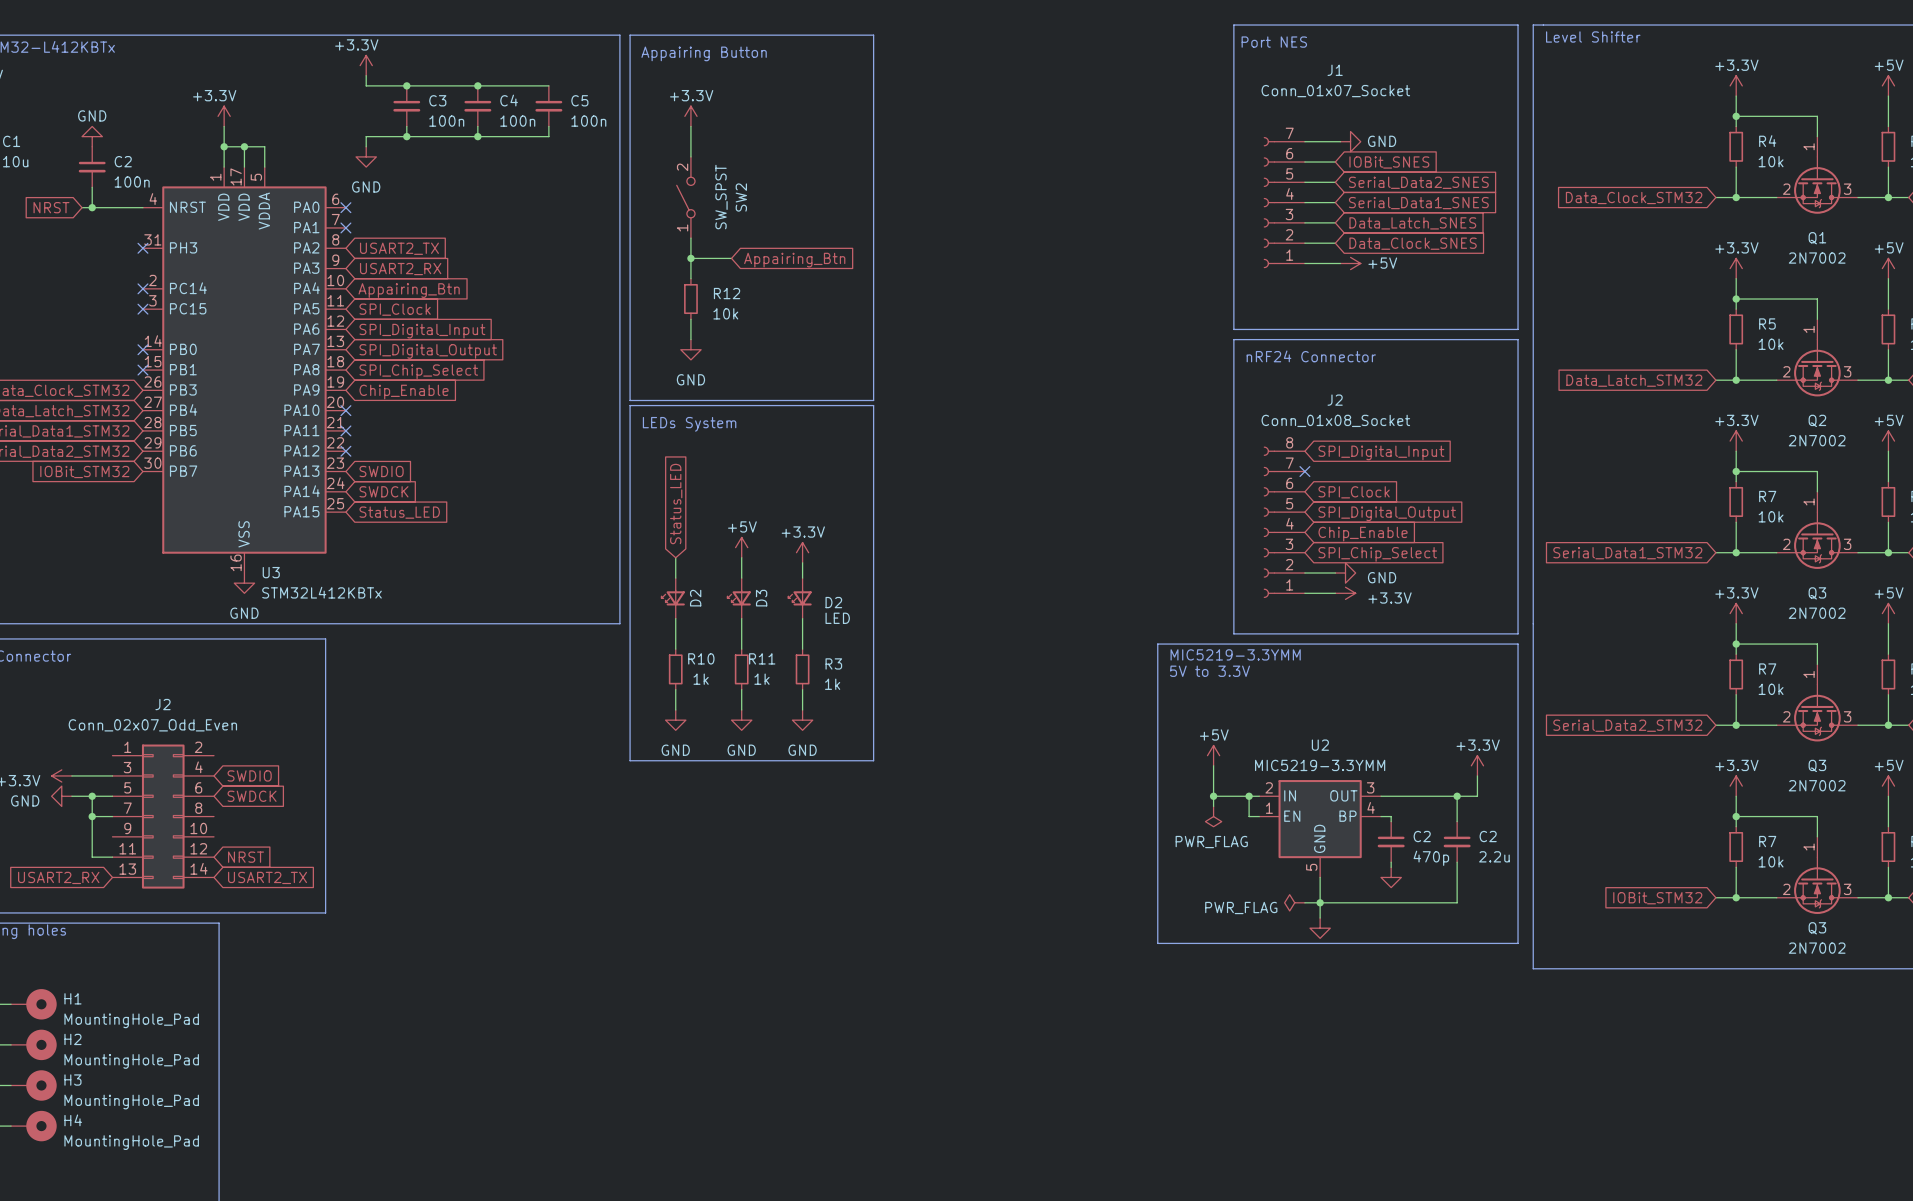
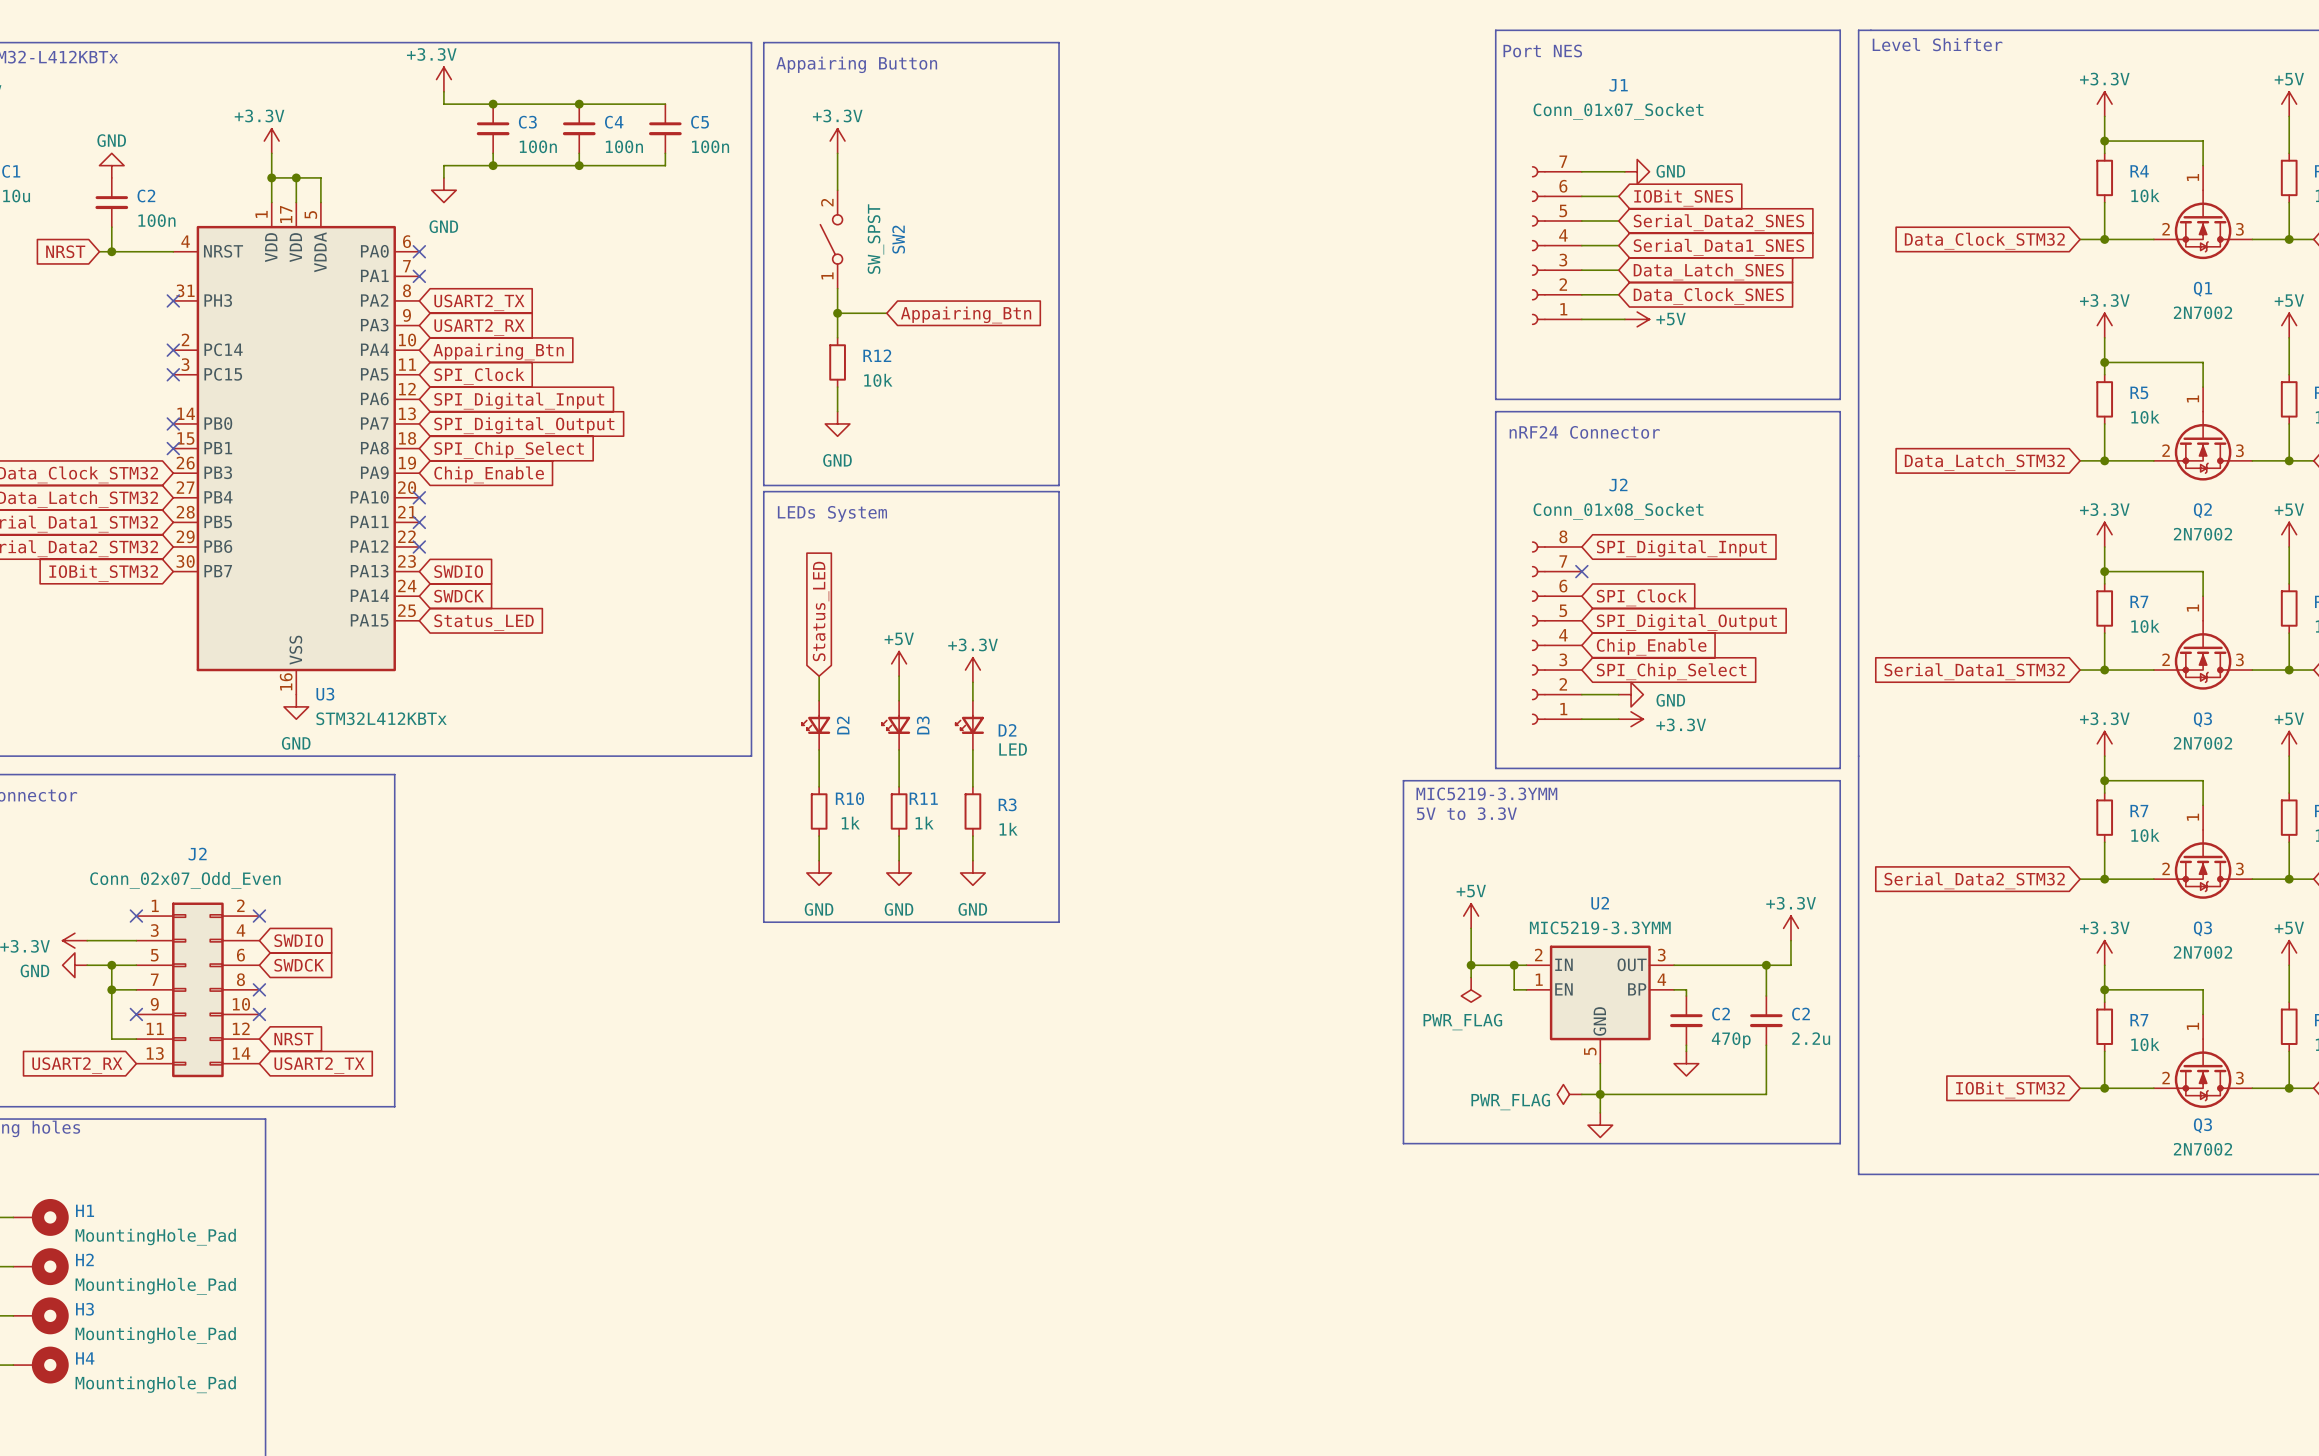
no-connect mark: none -> (136, 916)
no-connect mark: none -> (259, 916)
no-connect mark: none -> (259, 989)
no-connect mark: none -> (136, 1014)
no-connect mark: none -> (259, 1014)

